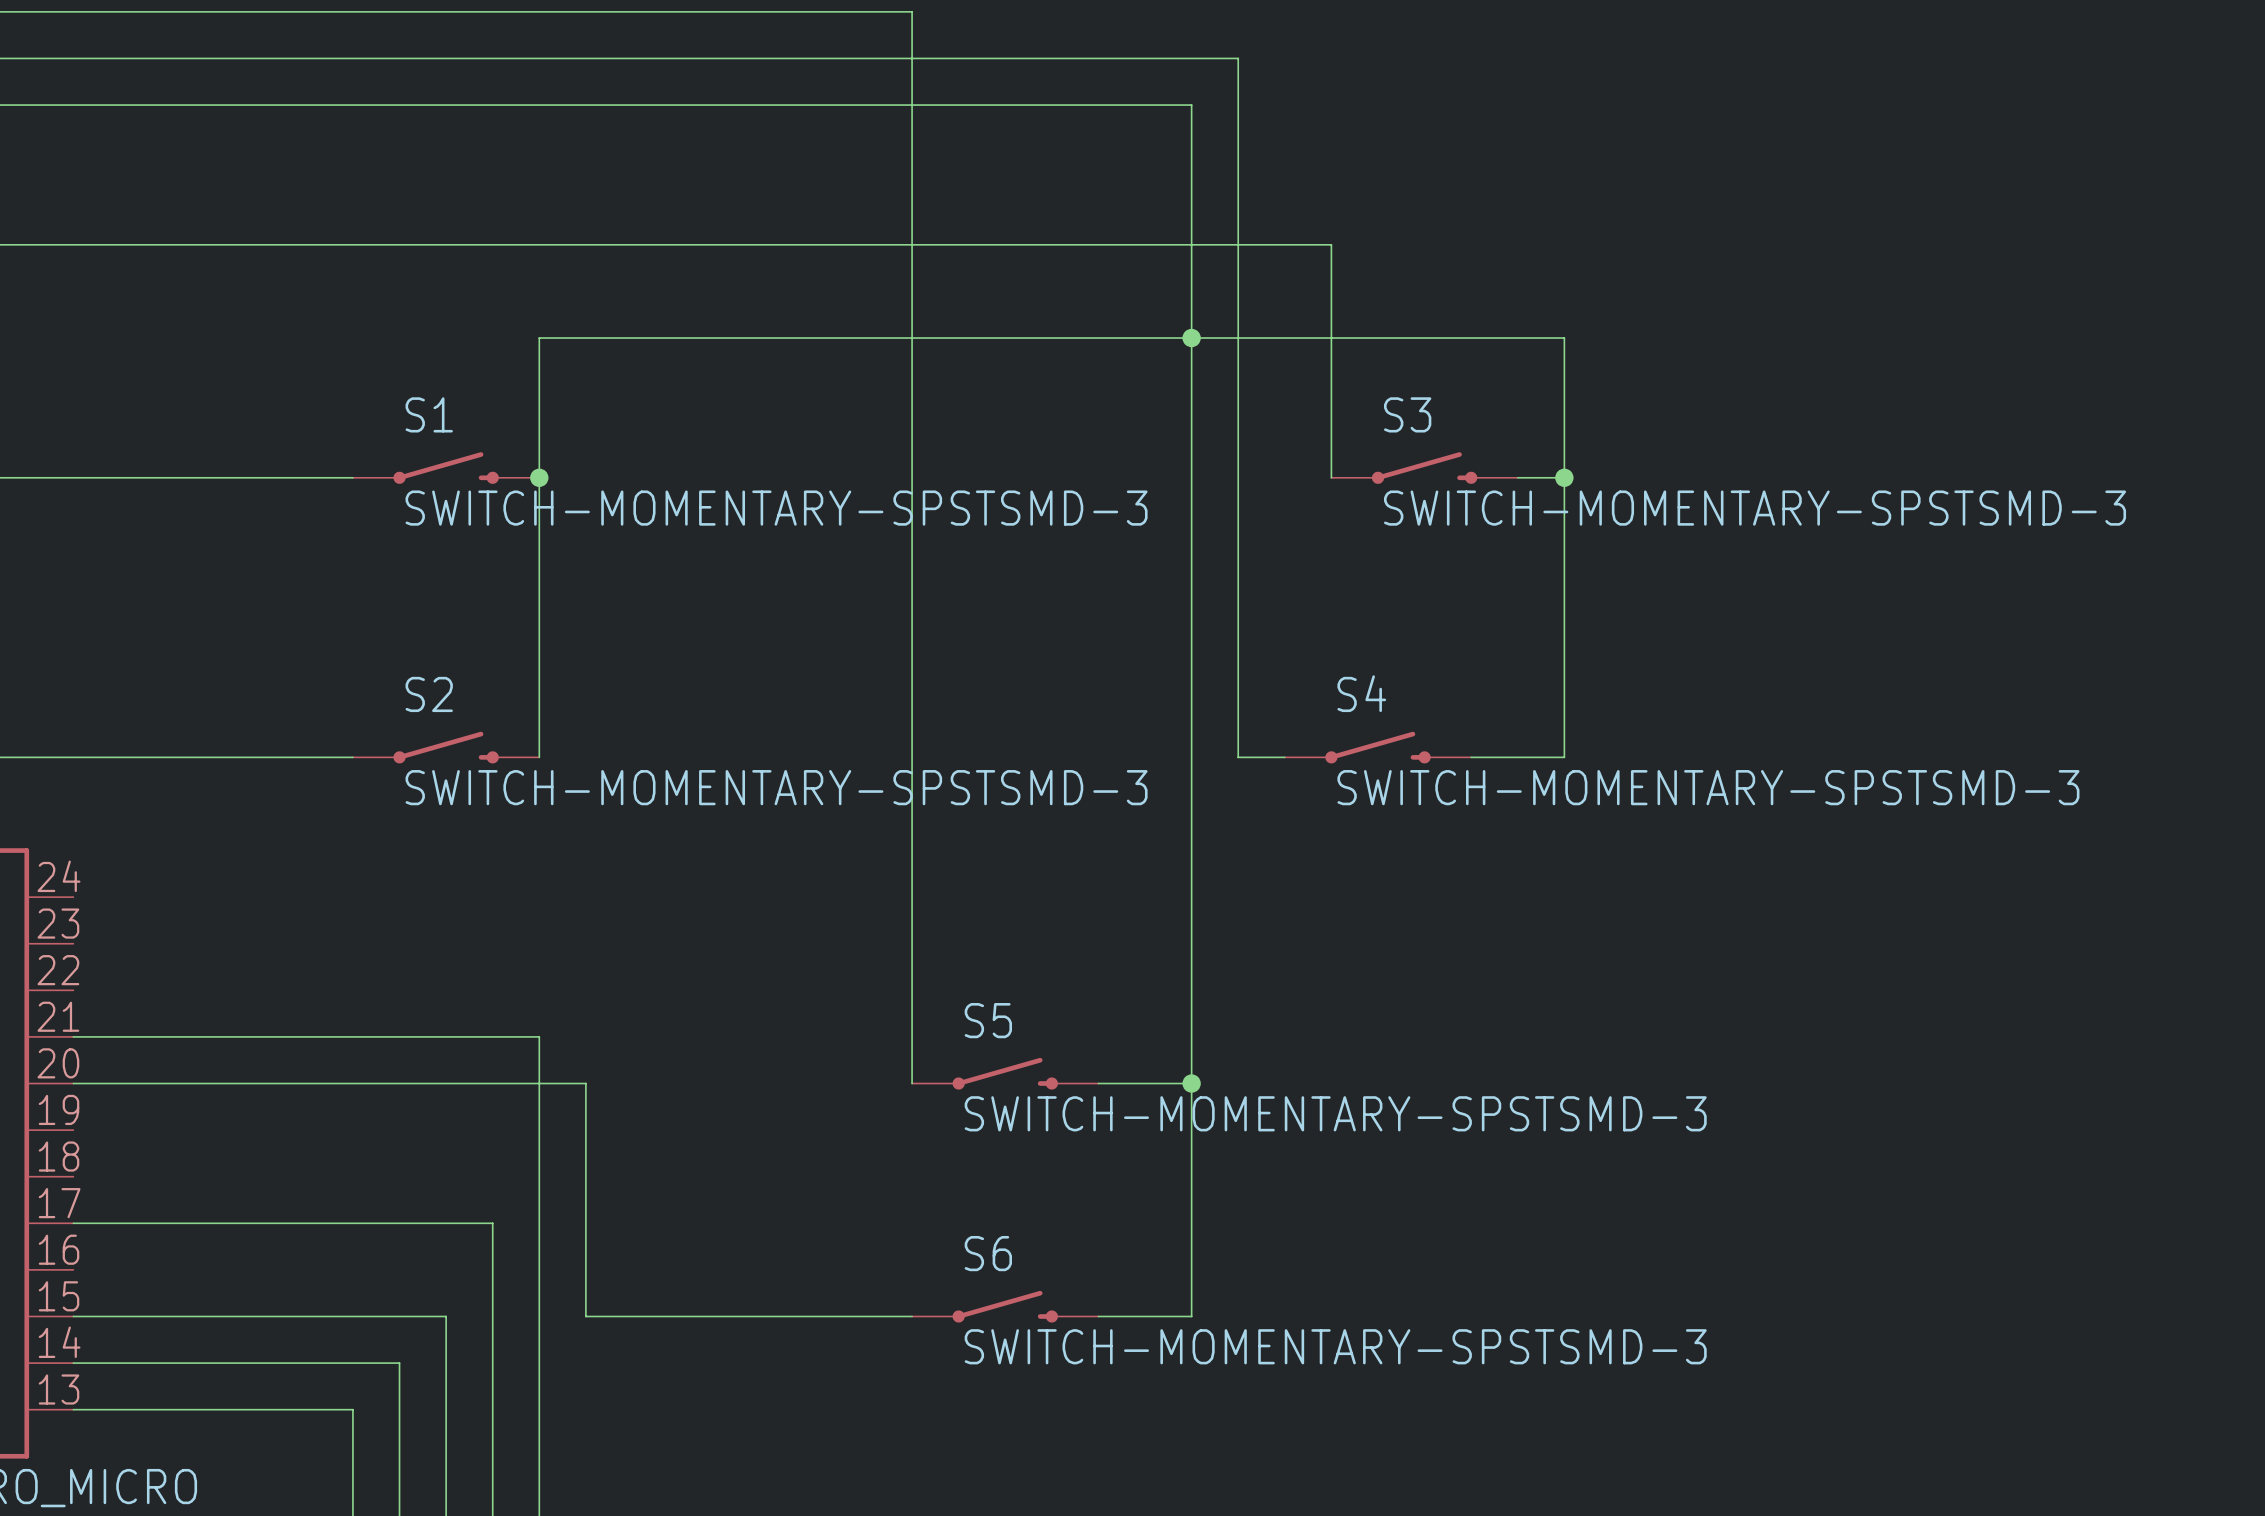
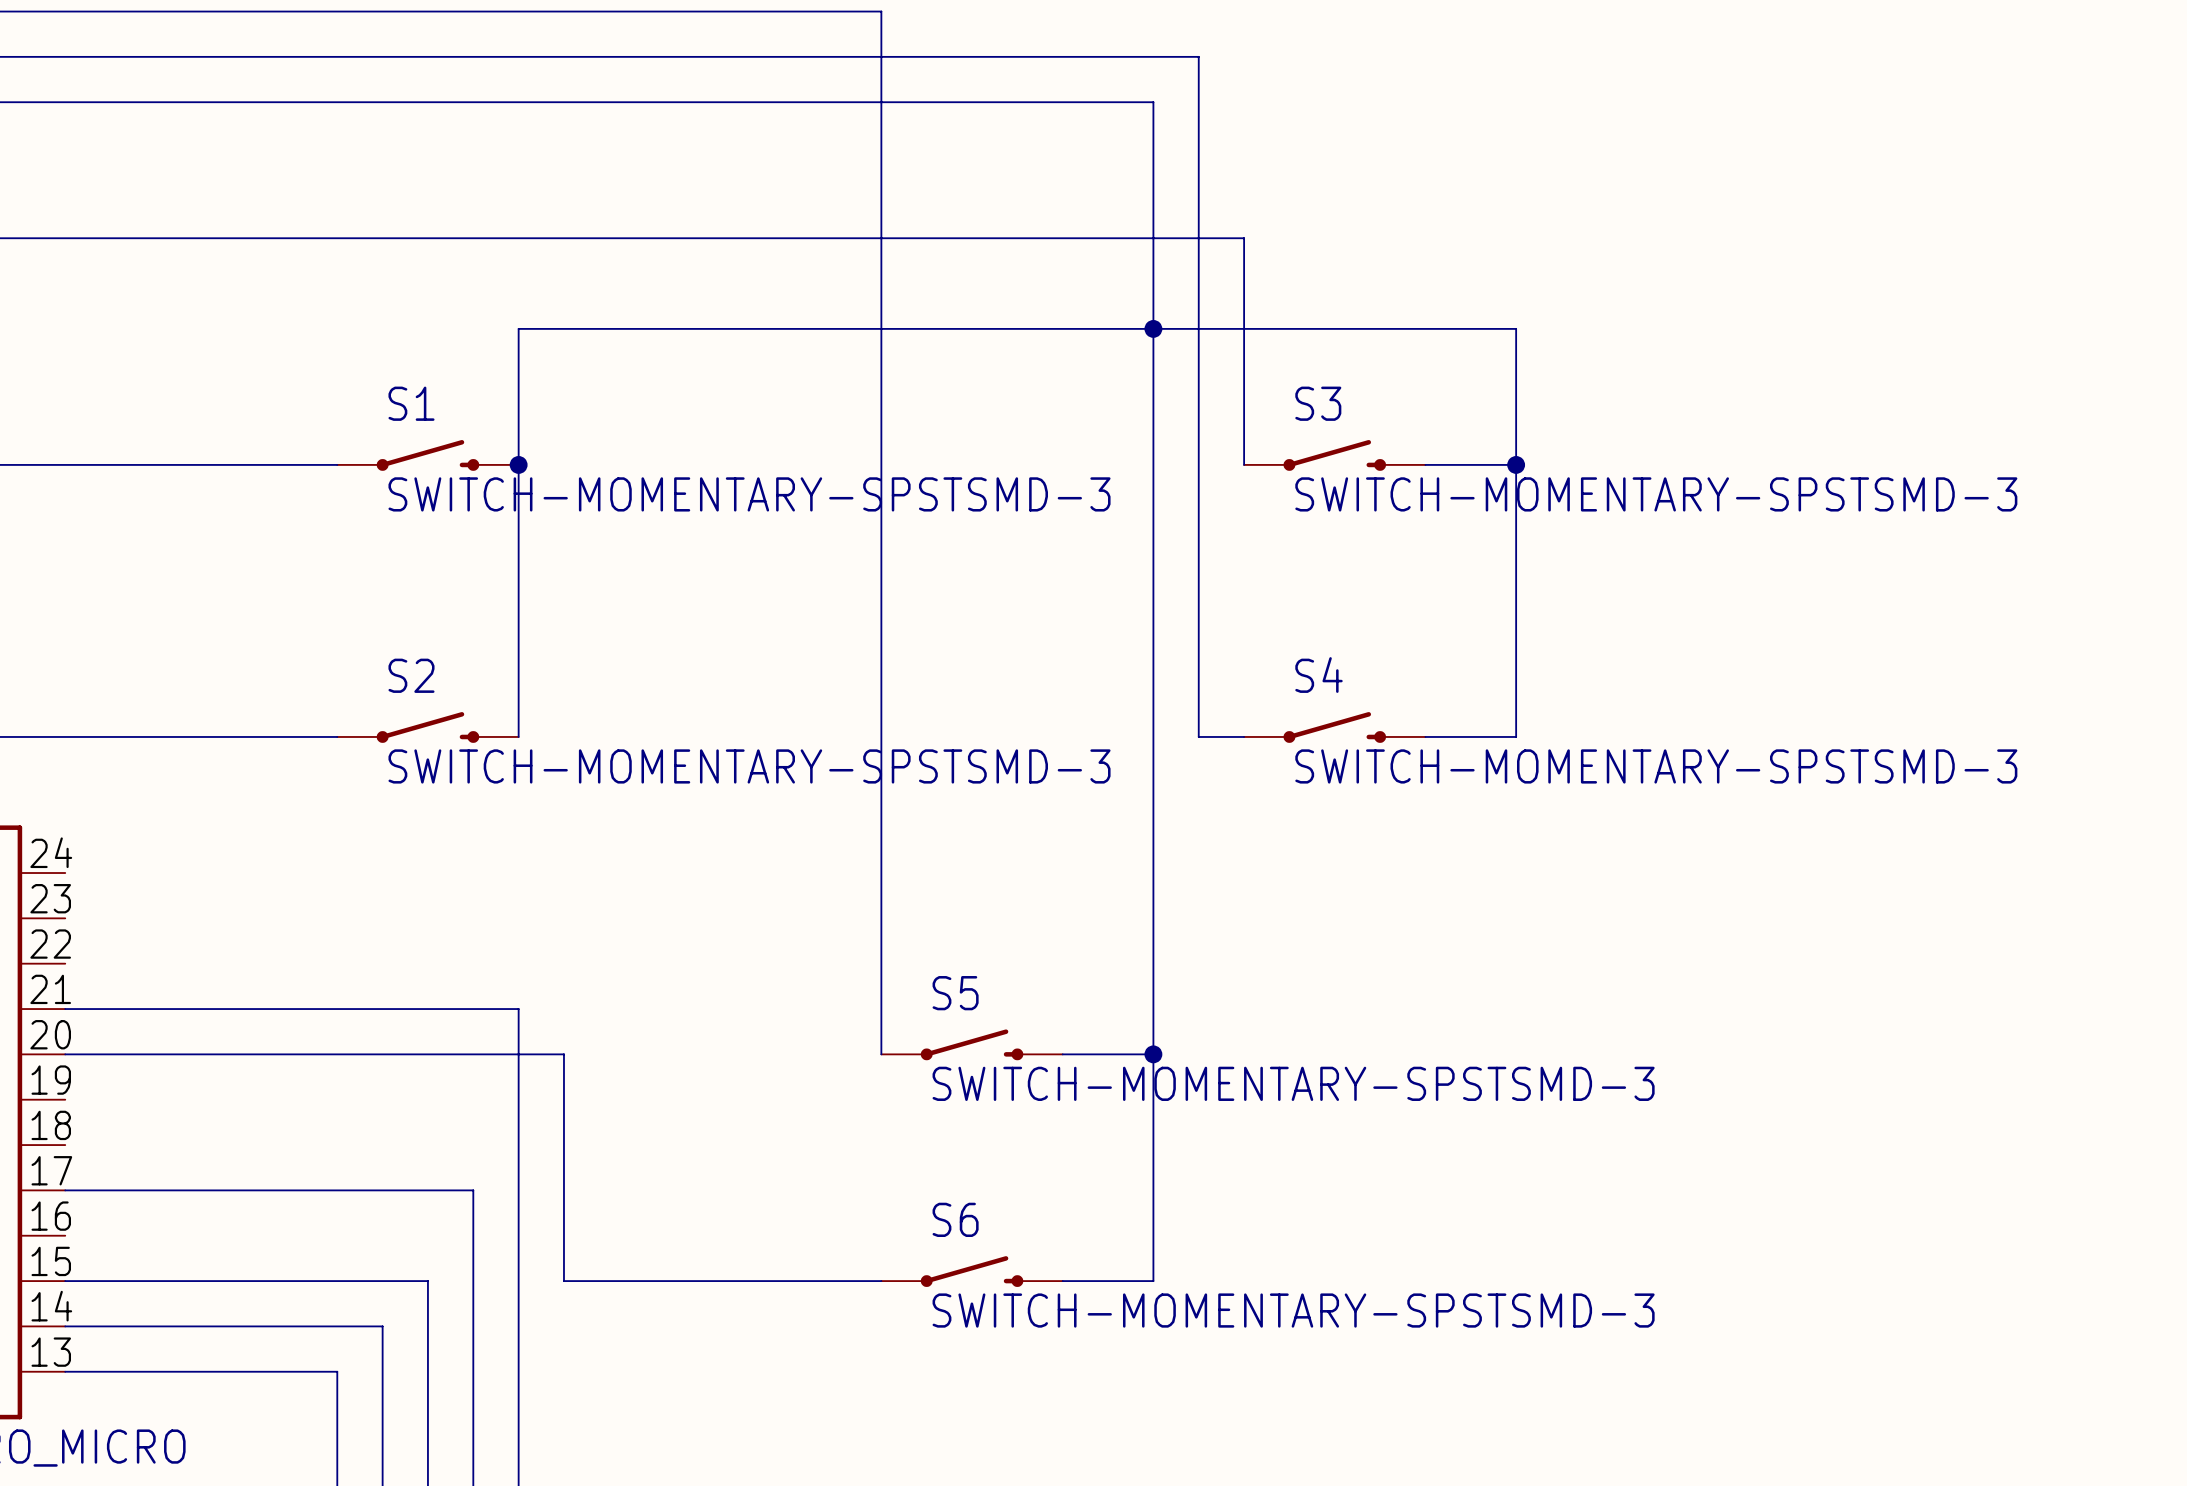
wire: (1284, 244) (1331, 244) (1331, 477) -> (1244, 238) (1244, 464)
S3 position: (1424, 468) -> (1334, 455)

